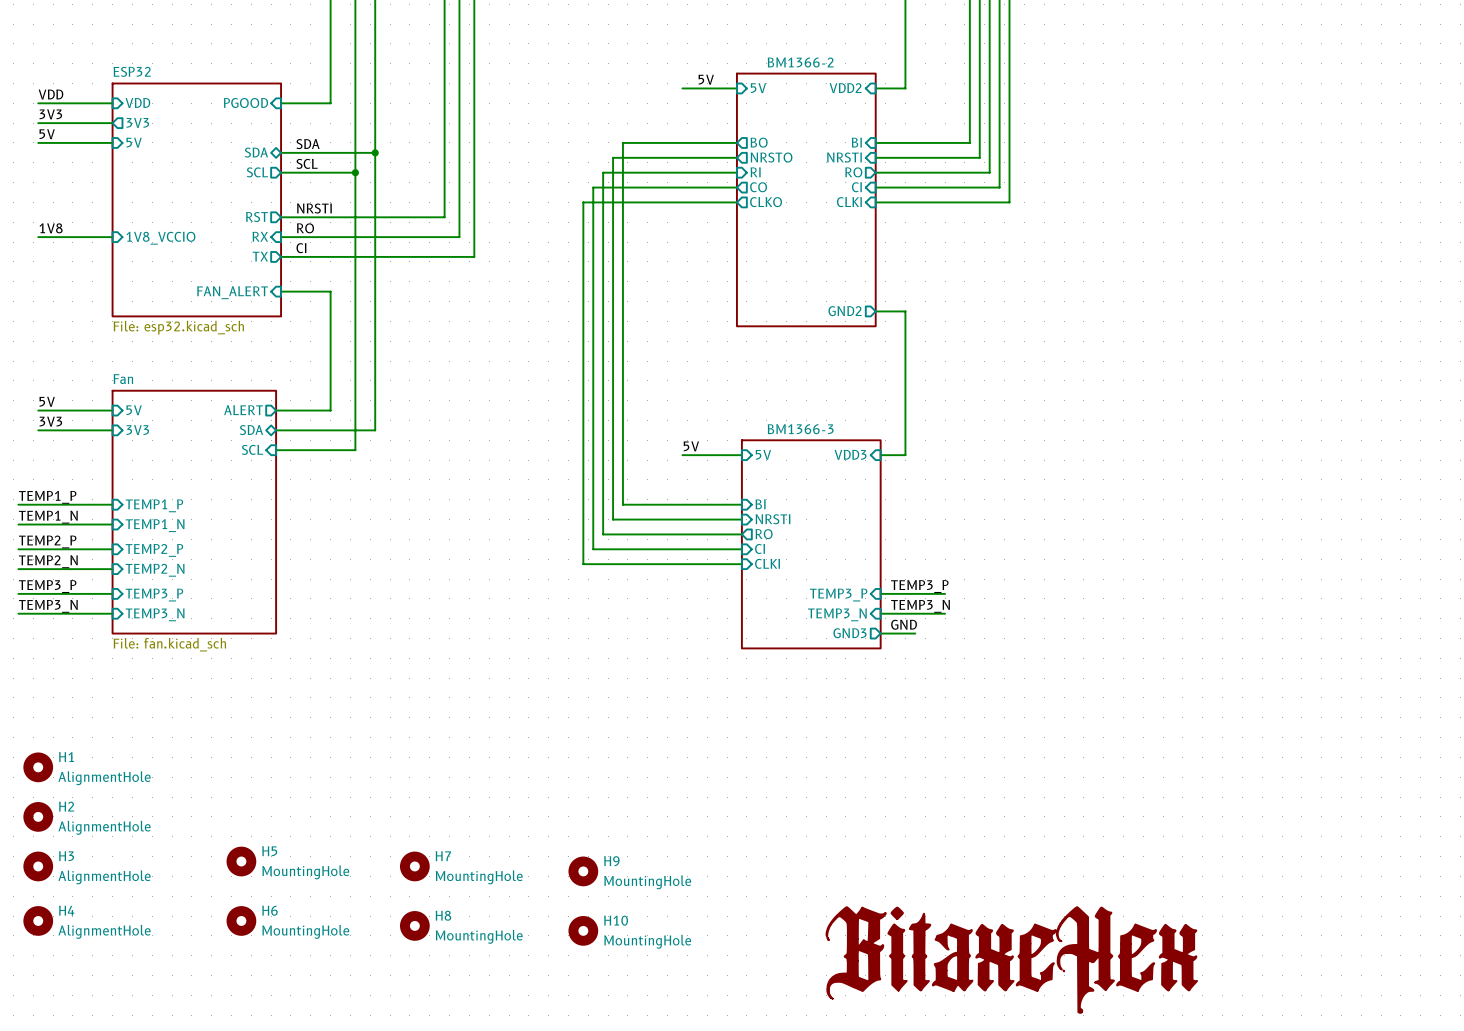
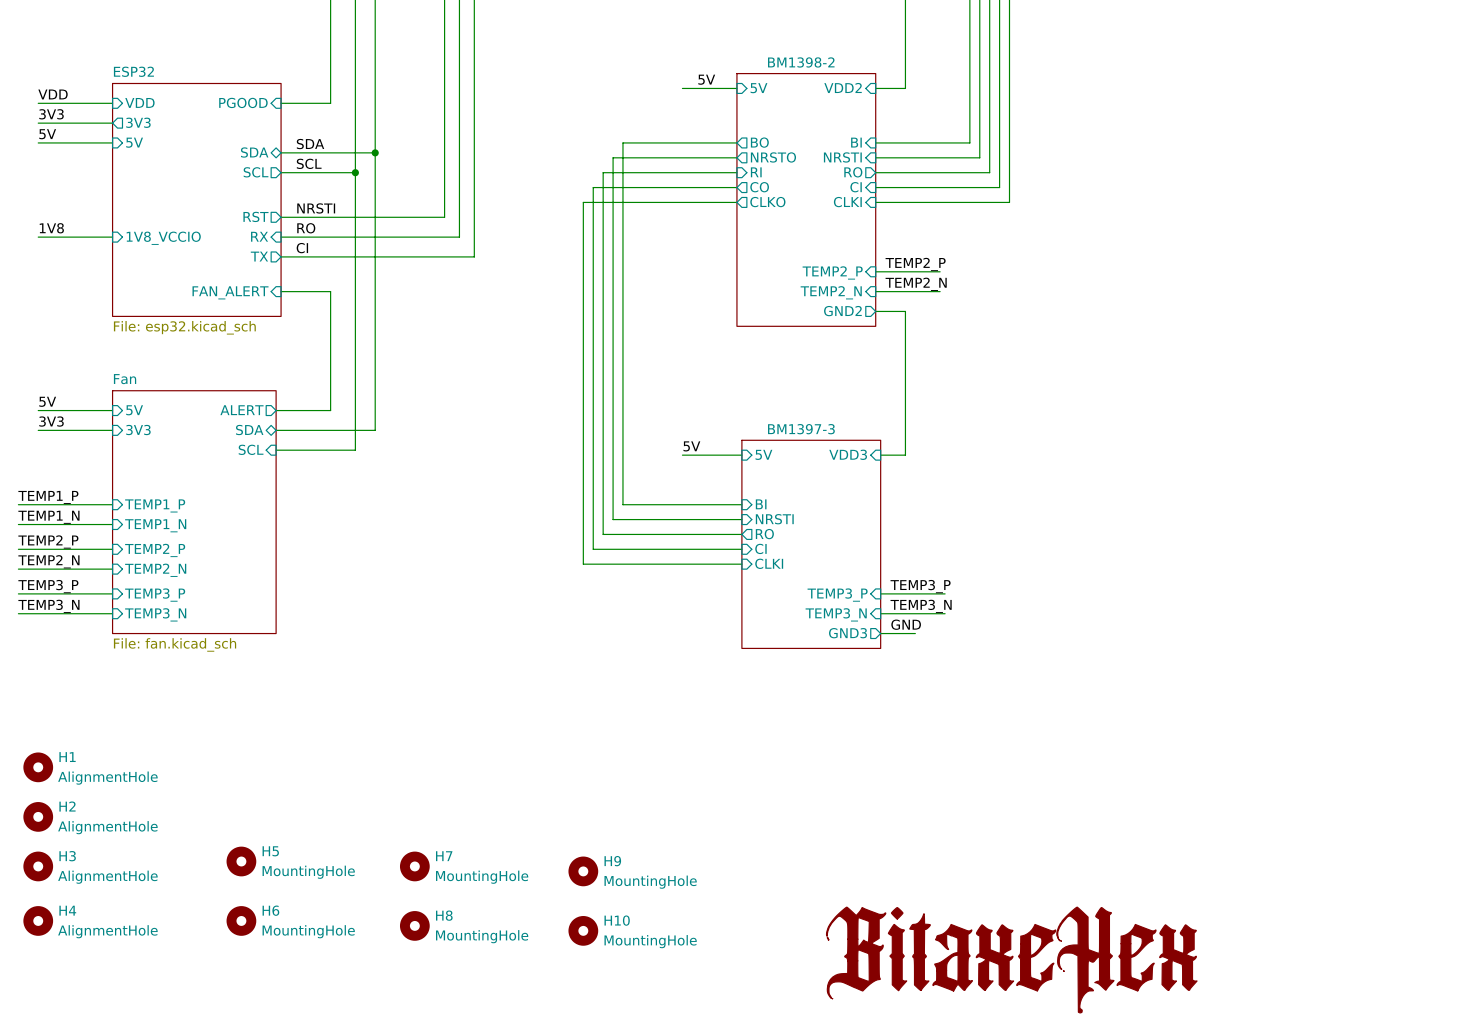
sheet BM1366-2 name: BM1366-2 (800, 62) -> BM1398-2 (801, 62)
label: none -> TEMP2_P (915, 264)
wire: none -> (875, 271) (940, 271)
sheet pin: none -> TEMP2_P (832, 272)
label: none -> TEMP2_N (916, 284)
wire: none -> (875, 291) (940, 291)
sheet pin: none -> TEMP2_N (831, 292)
sheet BM1366-3 name: BM1366-3 (800, 429) -> BM1397-3 (801, 429)

